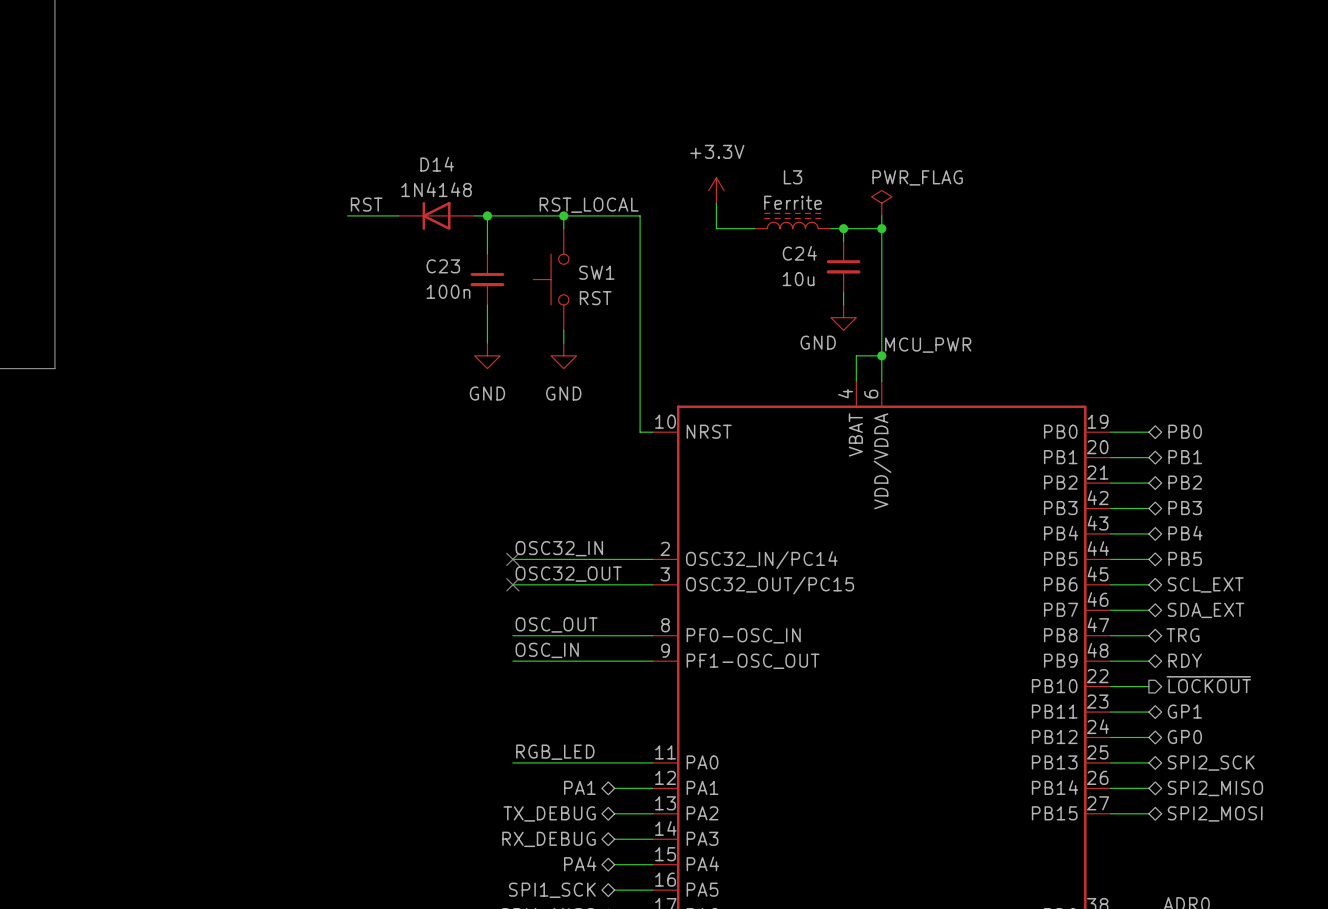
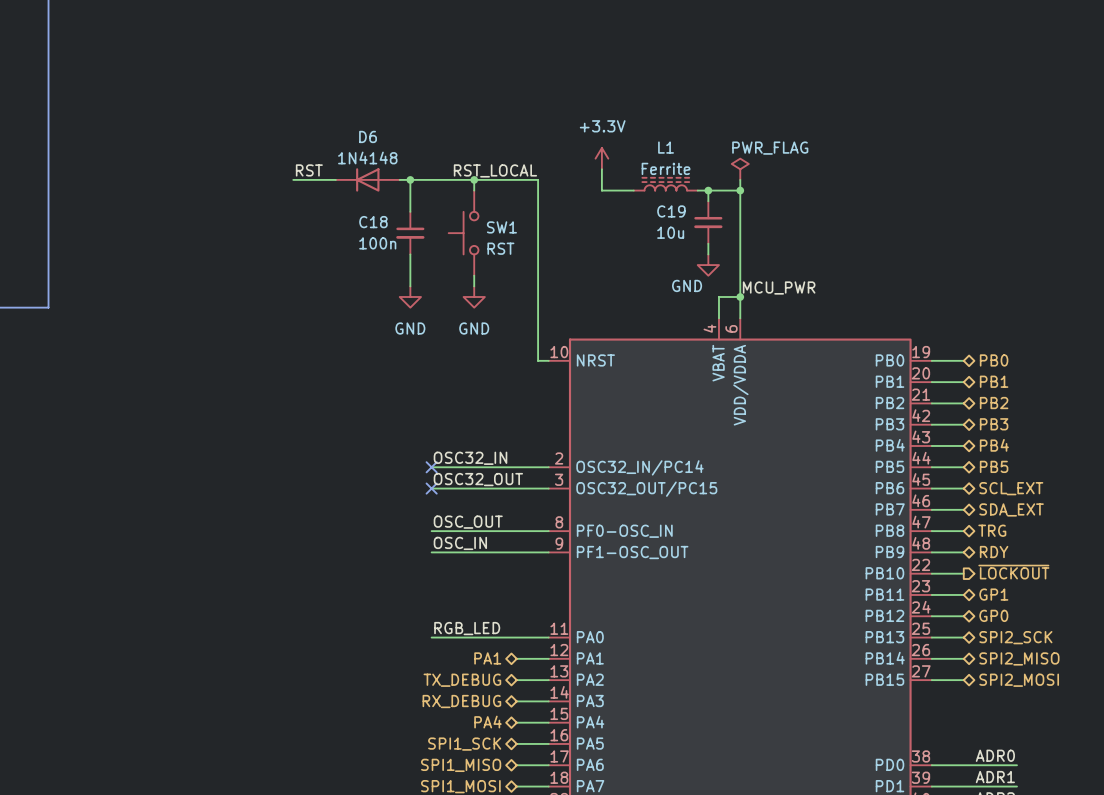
D14 name: D14 (437, 164) -> D6 (368, 136)
L3 name: L3 (793, 177) -> L1 (666, 147)
C24 name: C24 (799, 253) -> C19 (671, 211)
C23 name: C23 (443, 266) -> C18 (373, 222)

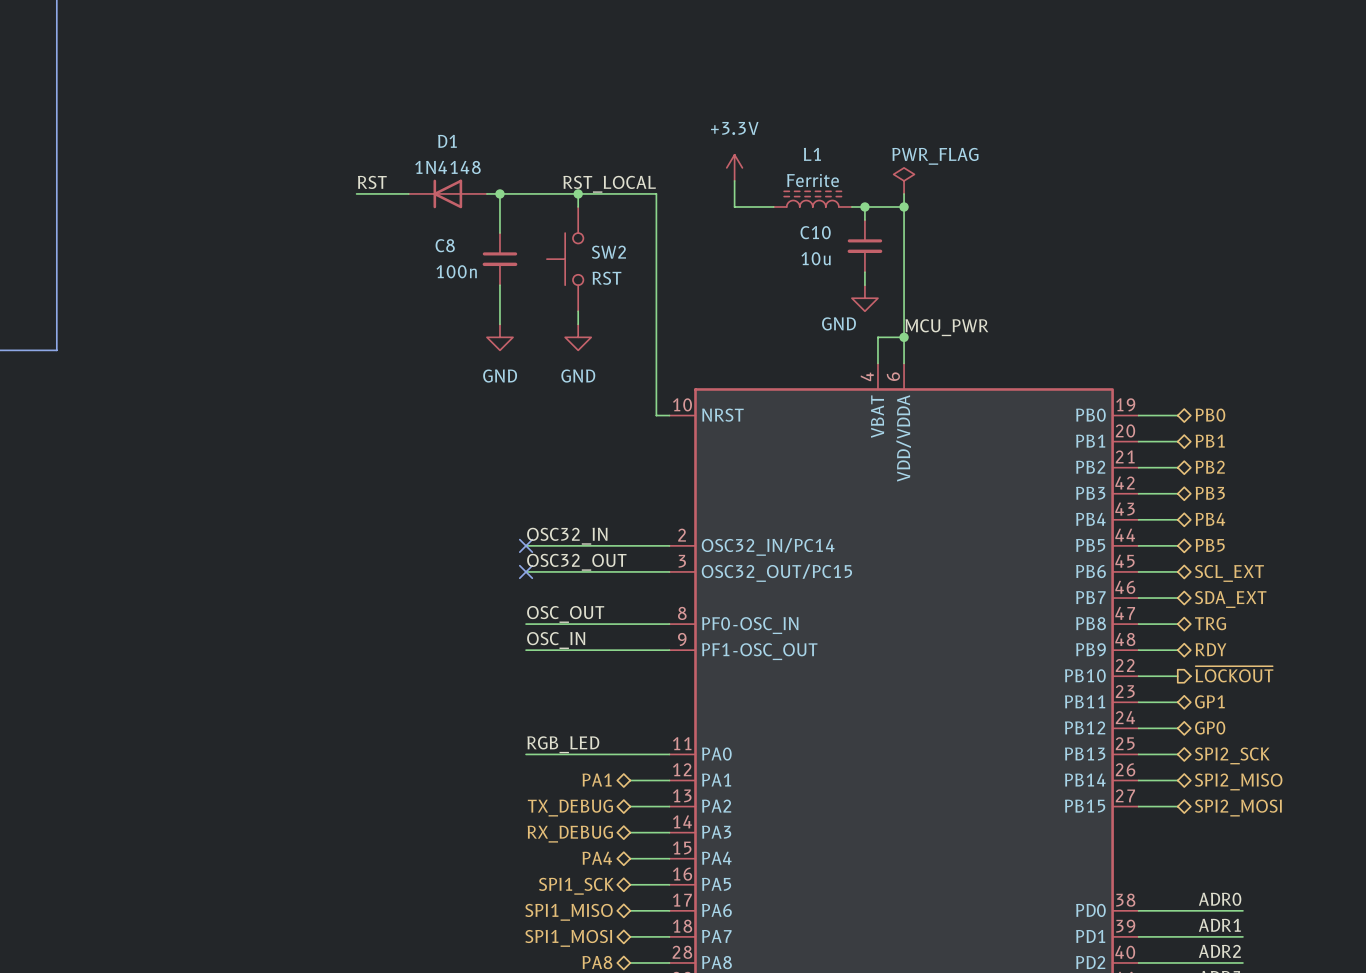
D6 name: D6 (368, 136) -> D1 (447, 141)
C19 name: C19 (671, 211) -> C10 (815, 232)
C18 name: C18 (373, 222) -> C8 (445, 245)
SW1 name: SW1 (501, 227) -> SW2 (608, 252)

